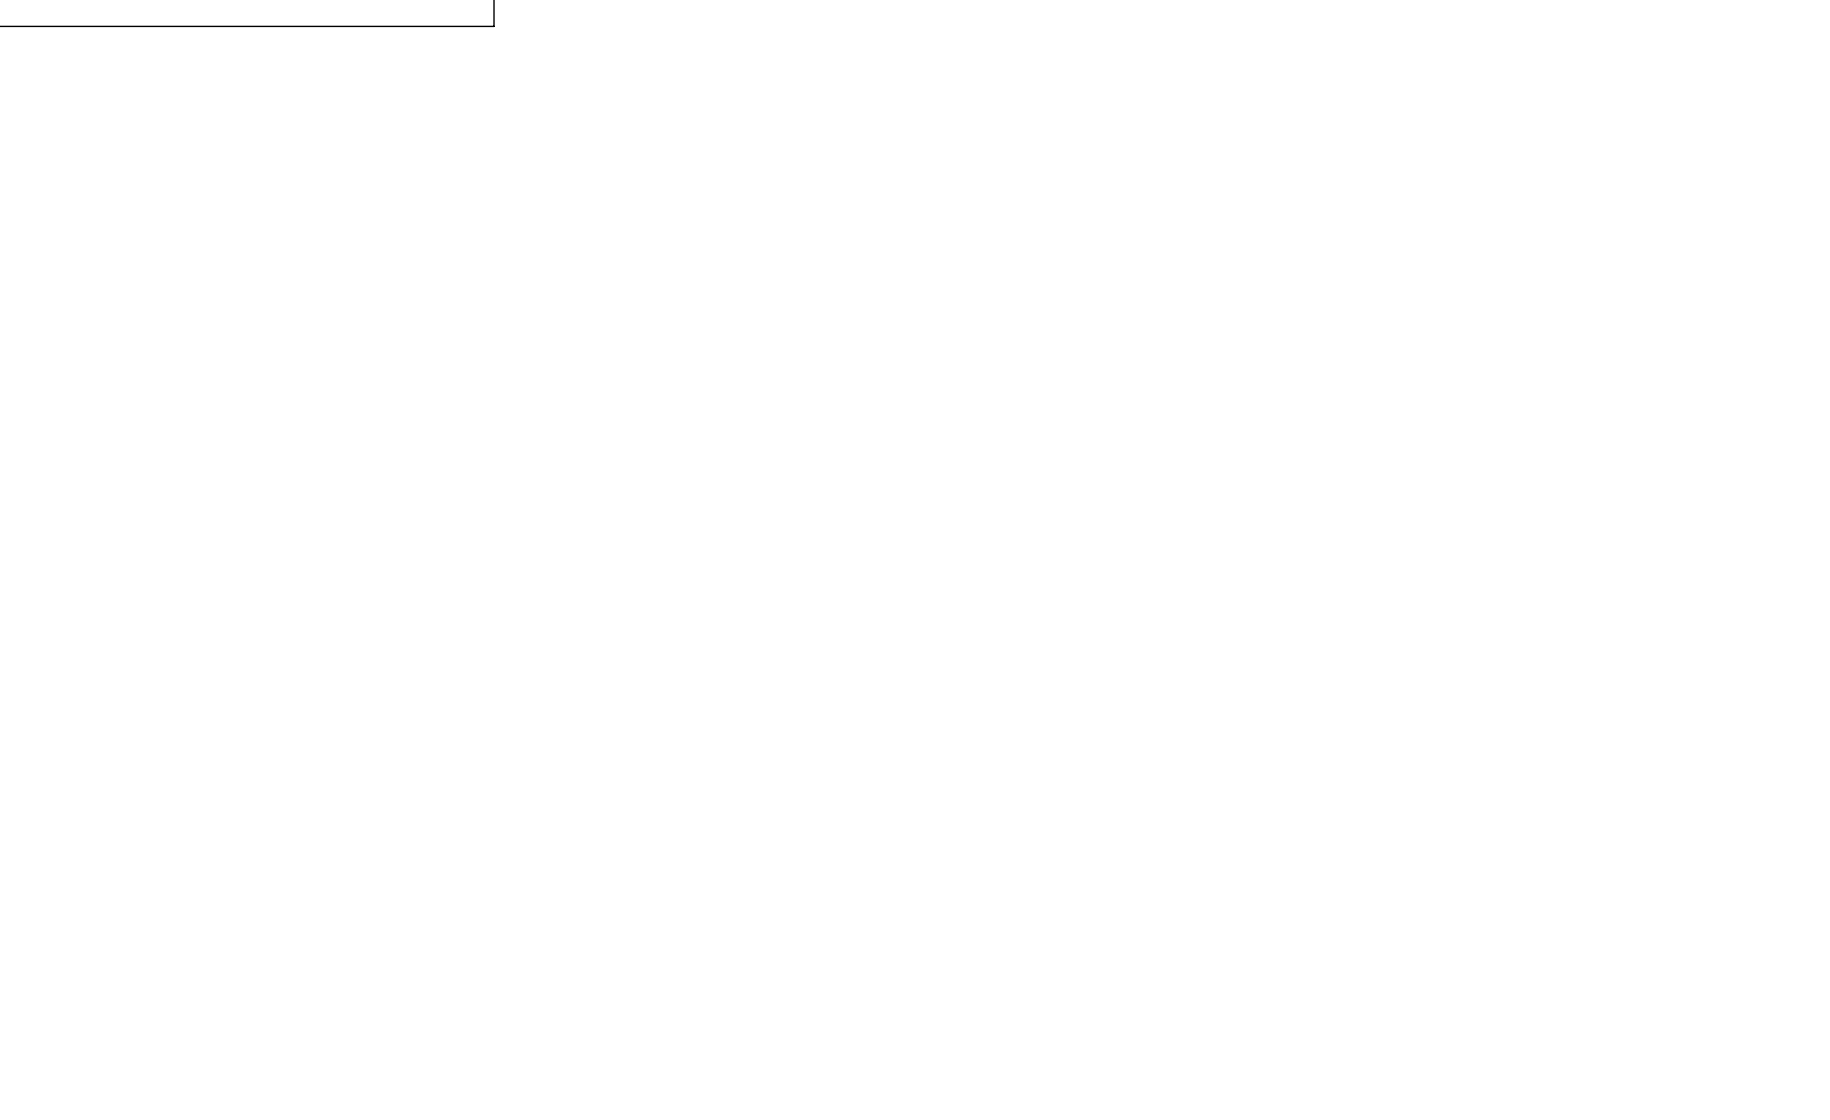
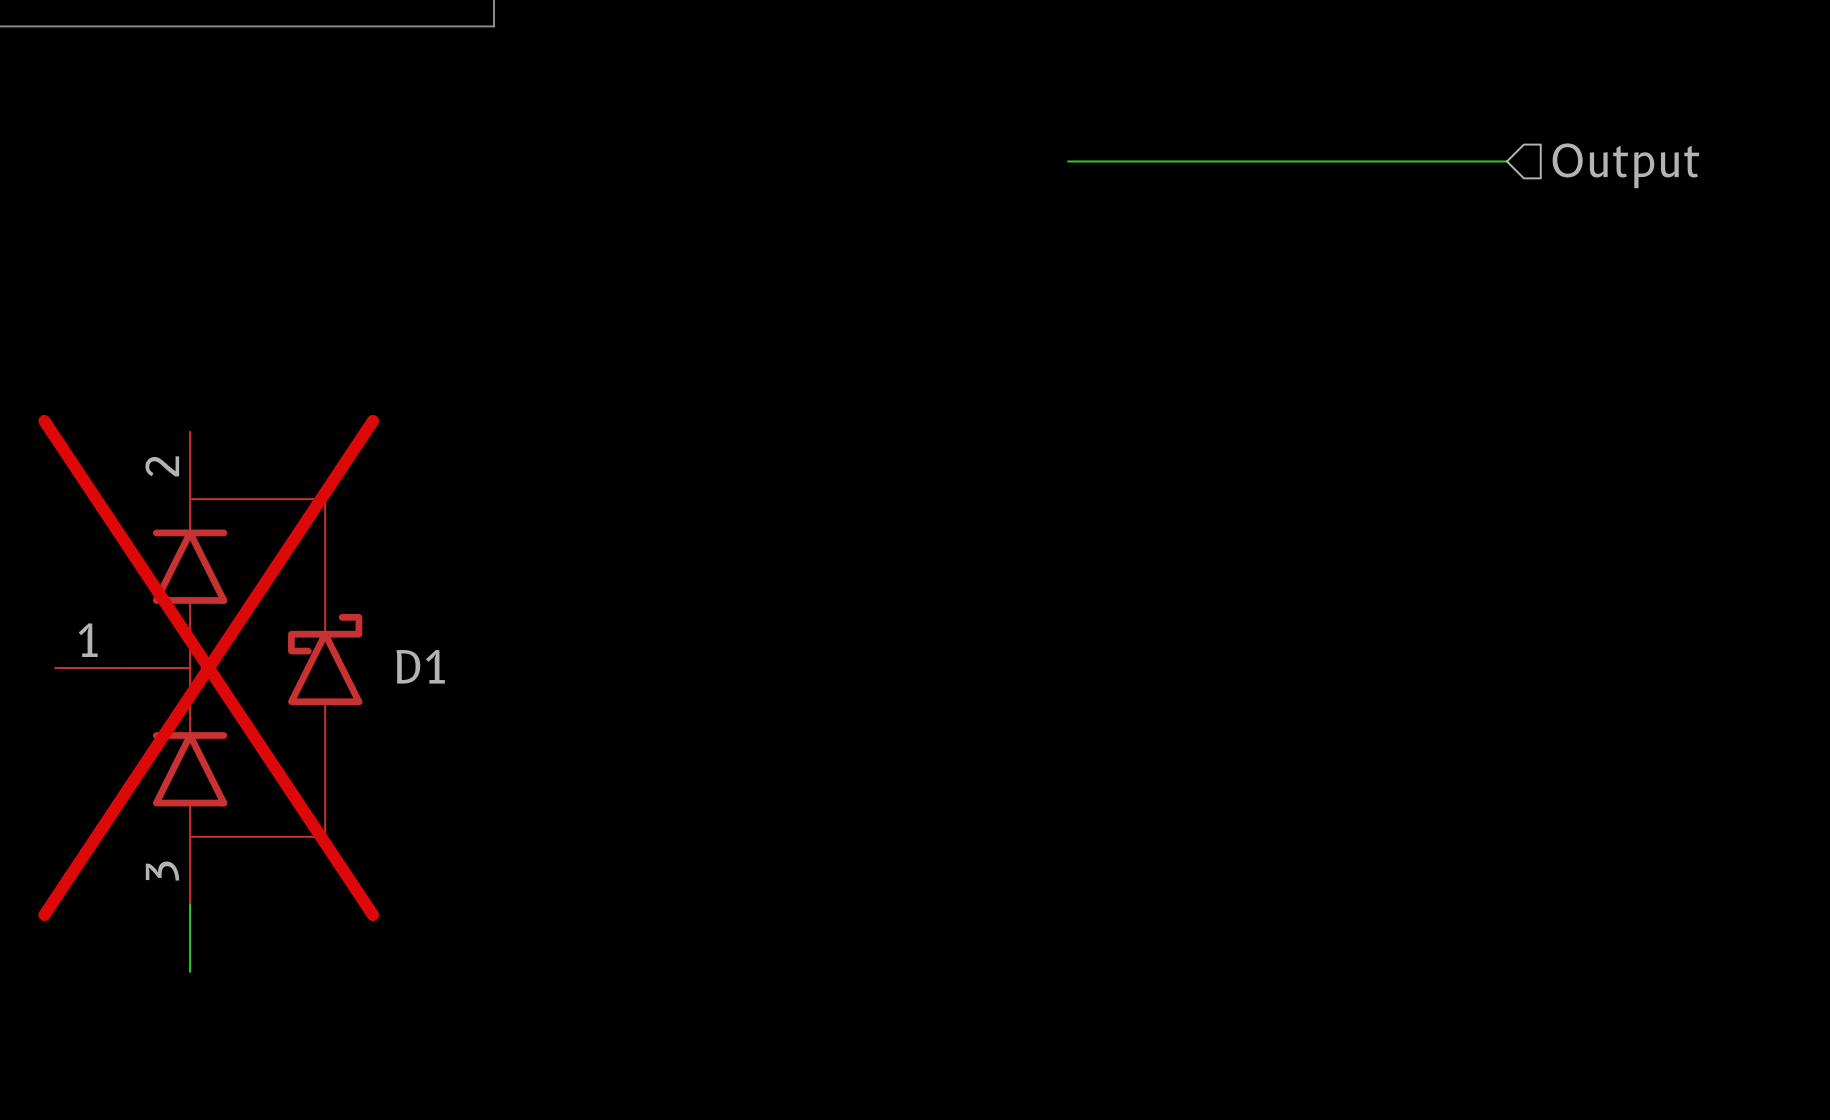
wire: none -> (1068, 161) (1506, 161)
hierarchical label: none -> Output (1625, 165)
D1: none -> (208, 667)
wire: none -> (190, 904) (190, 971)

